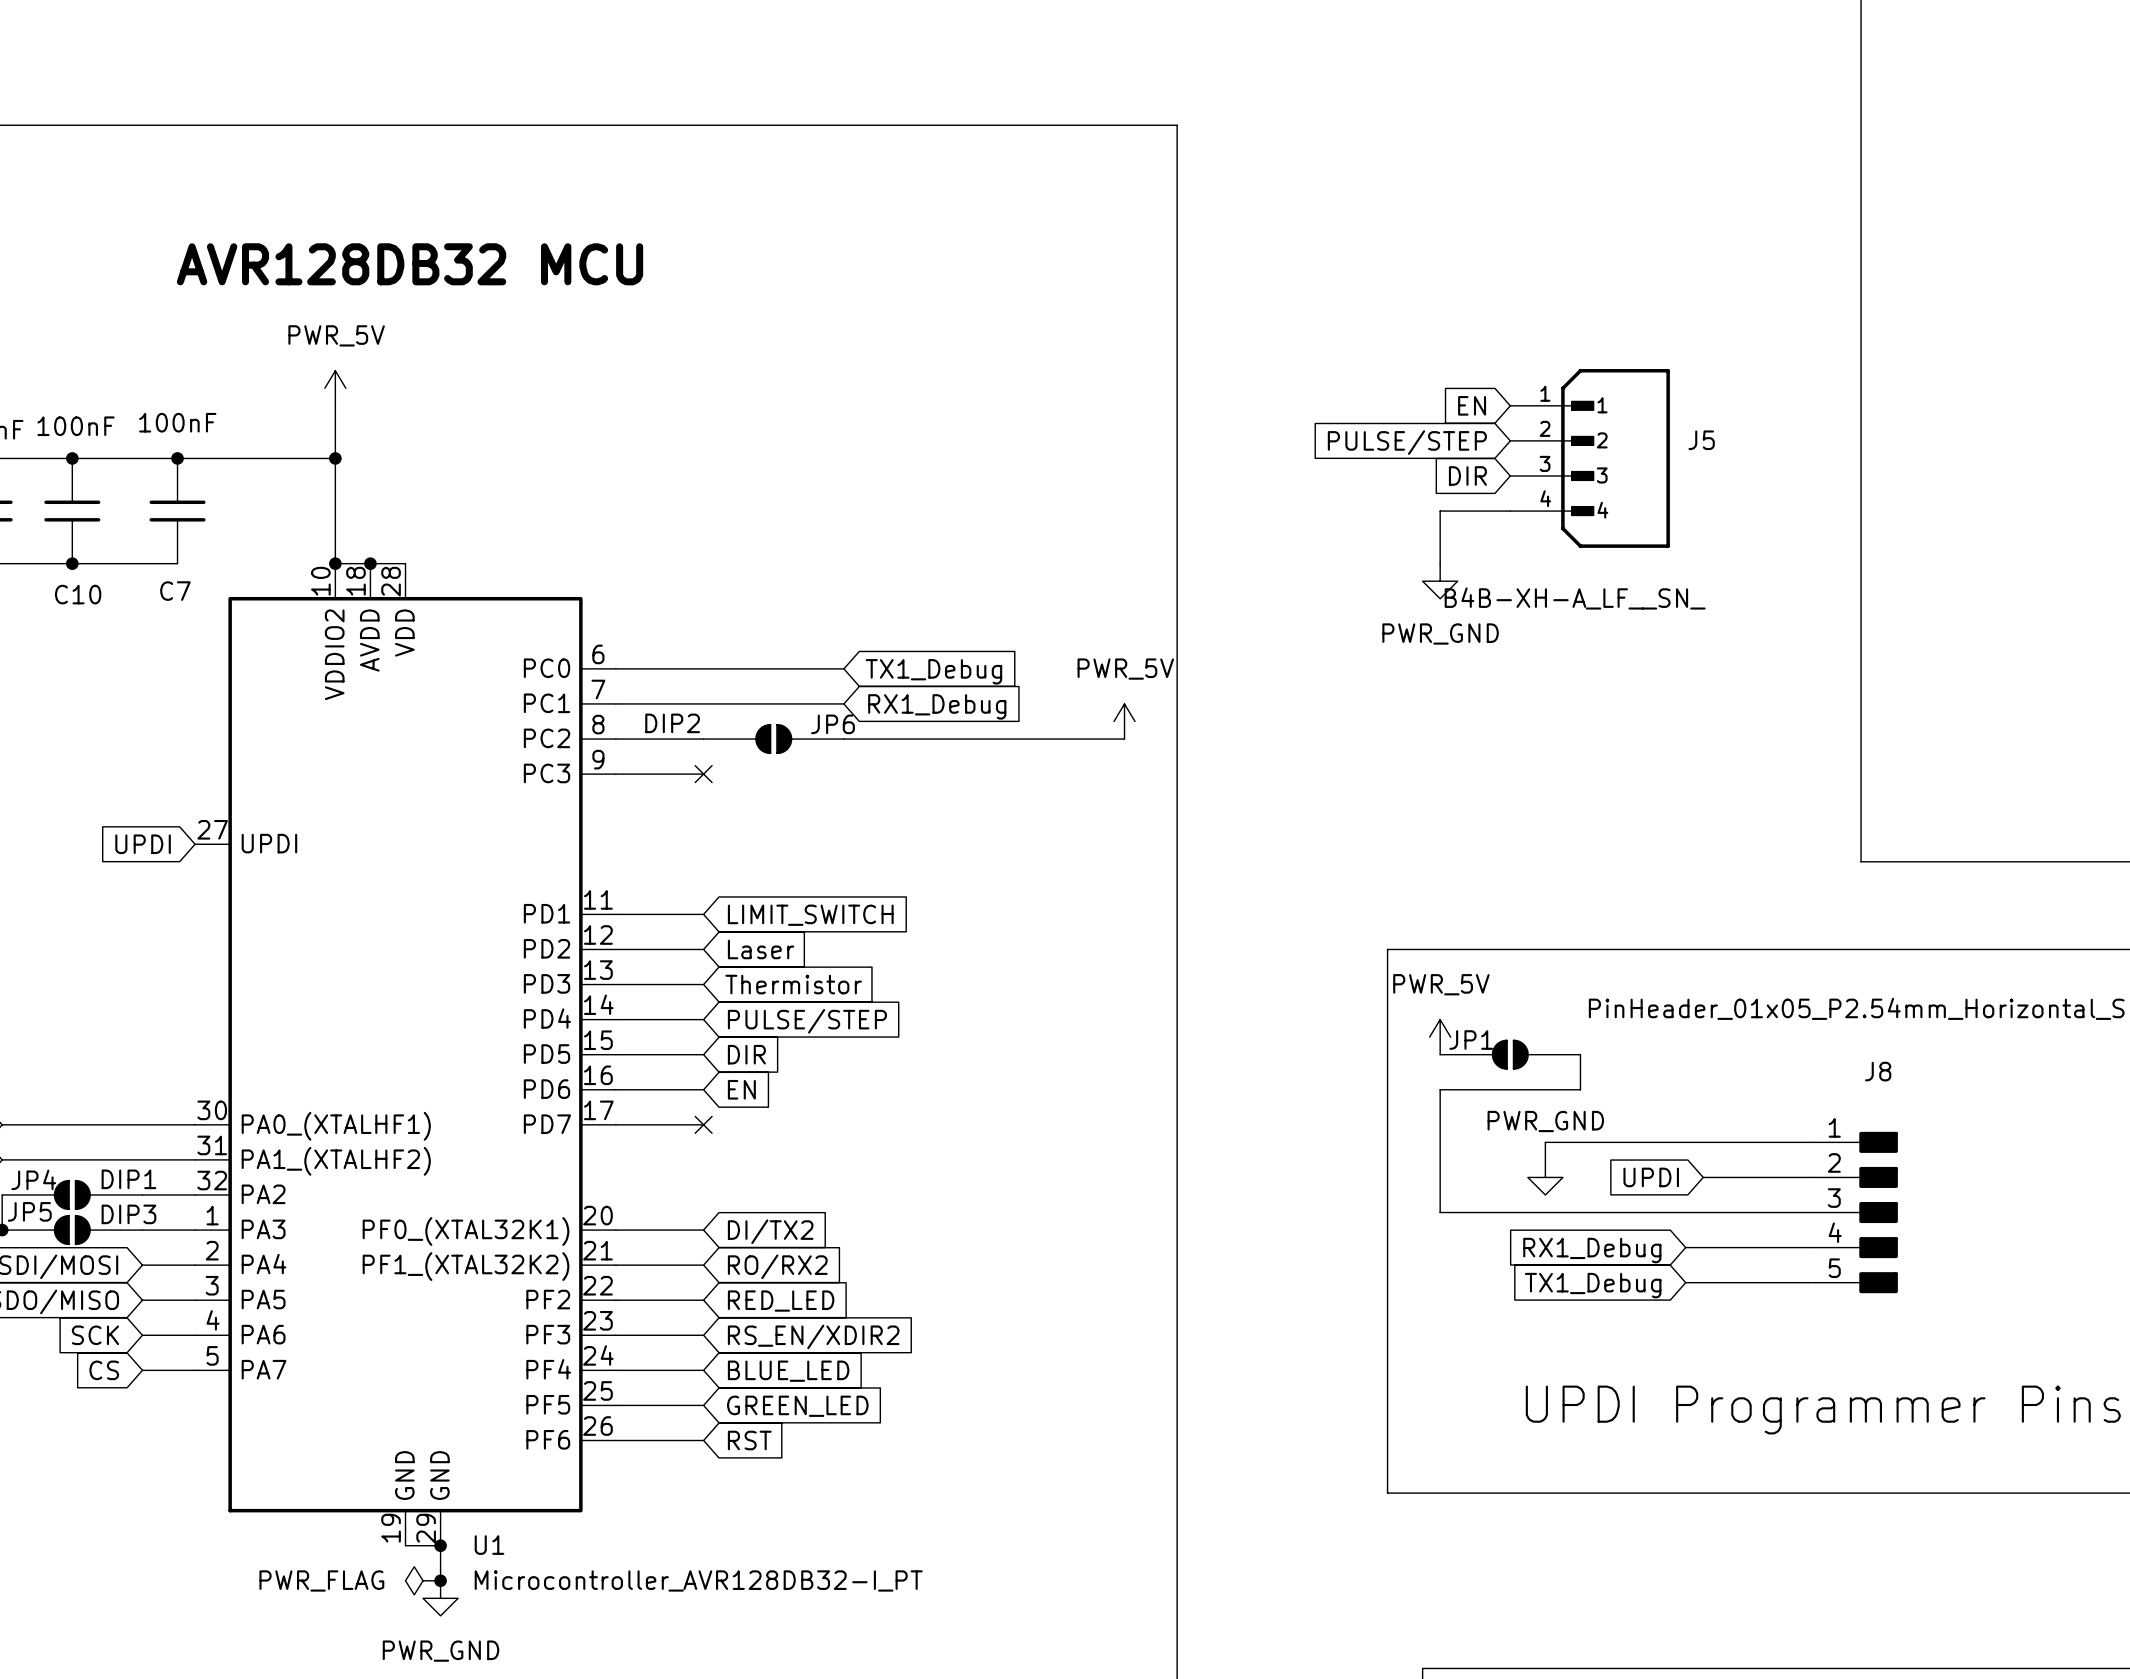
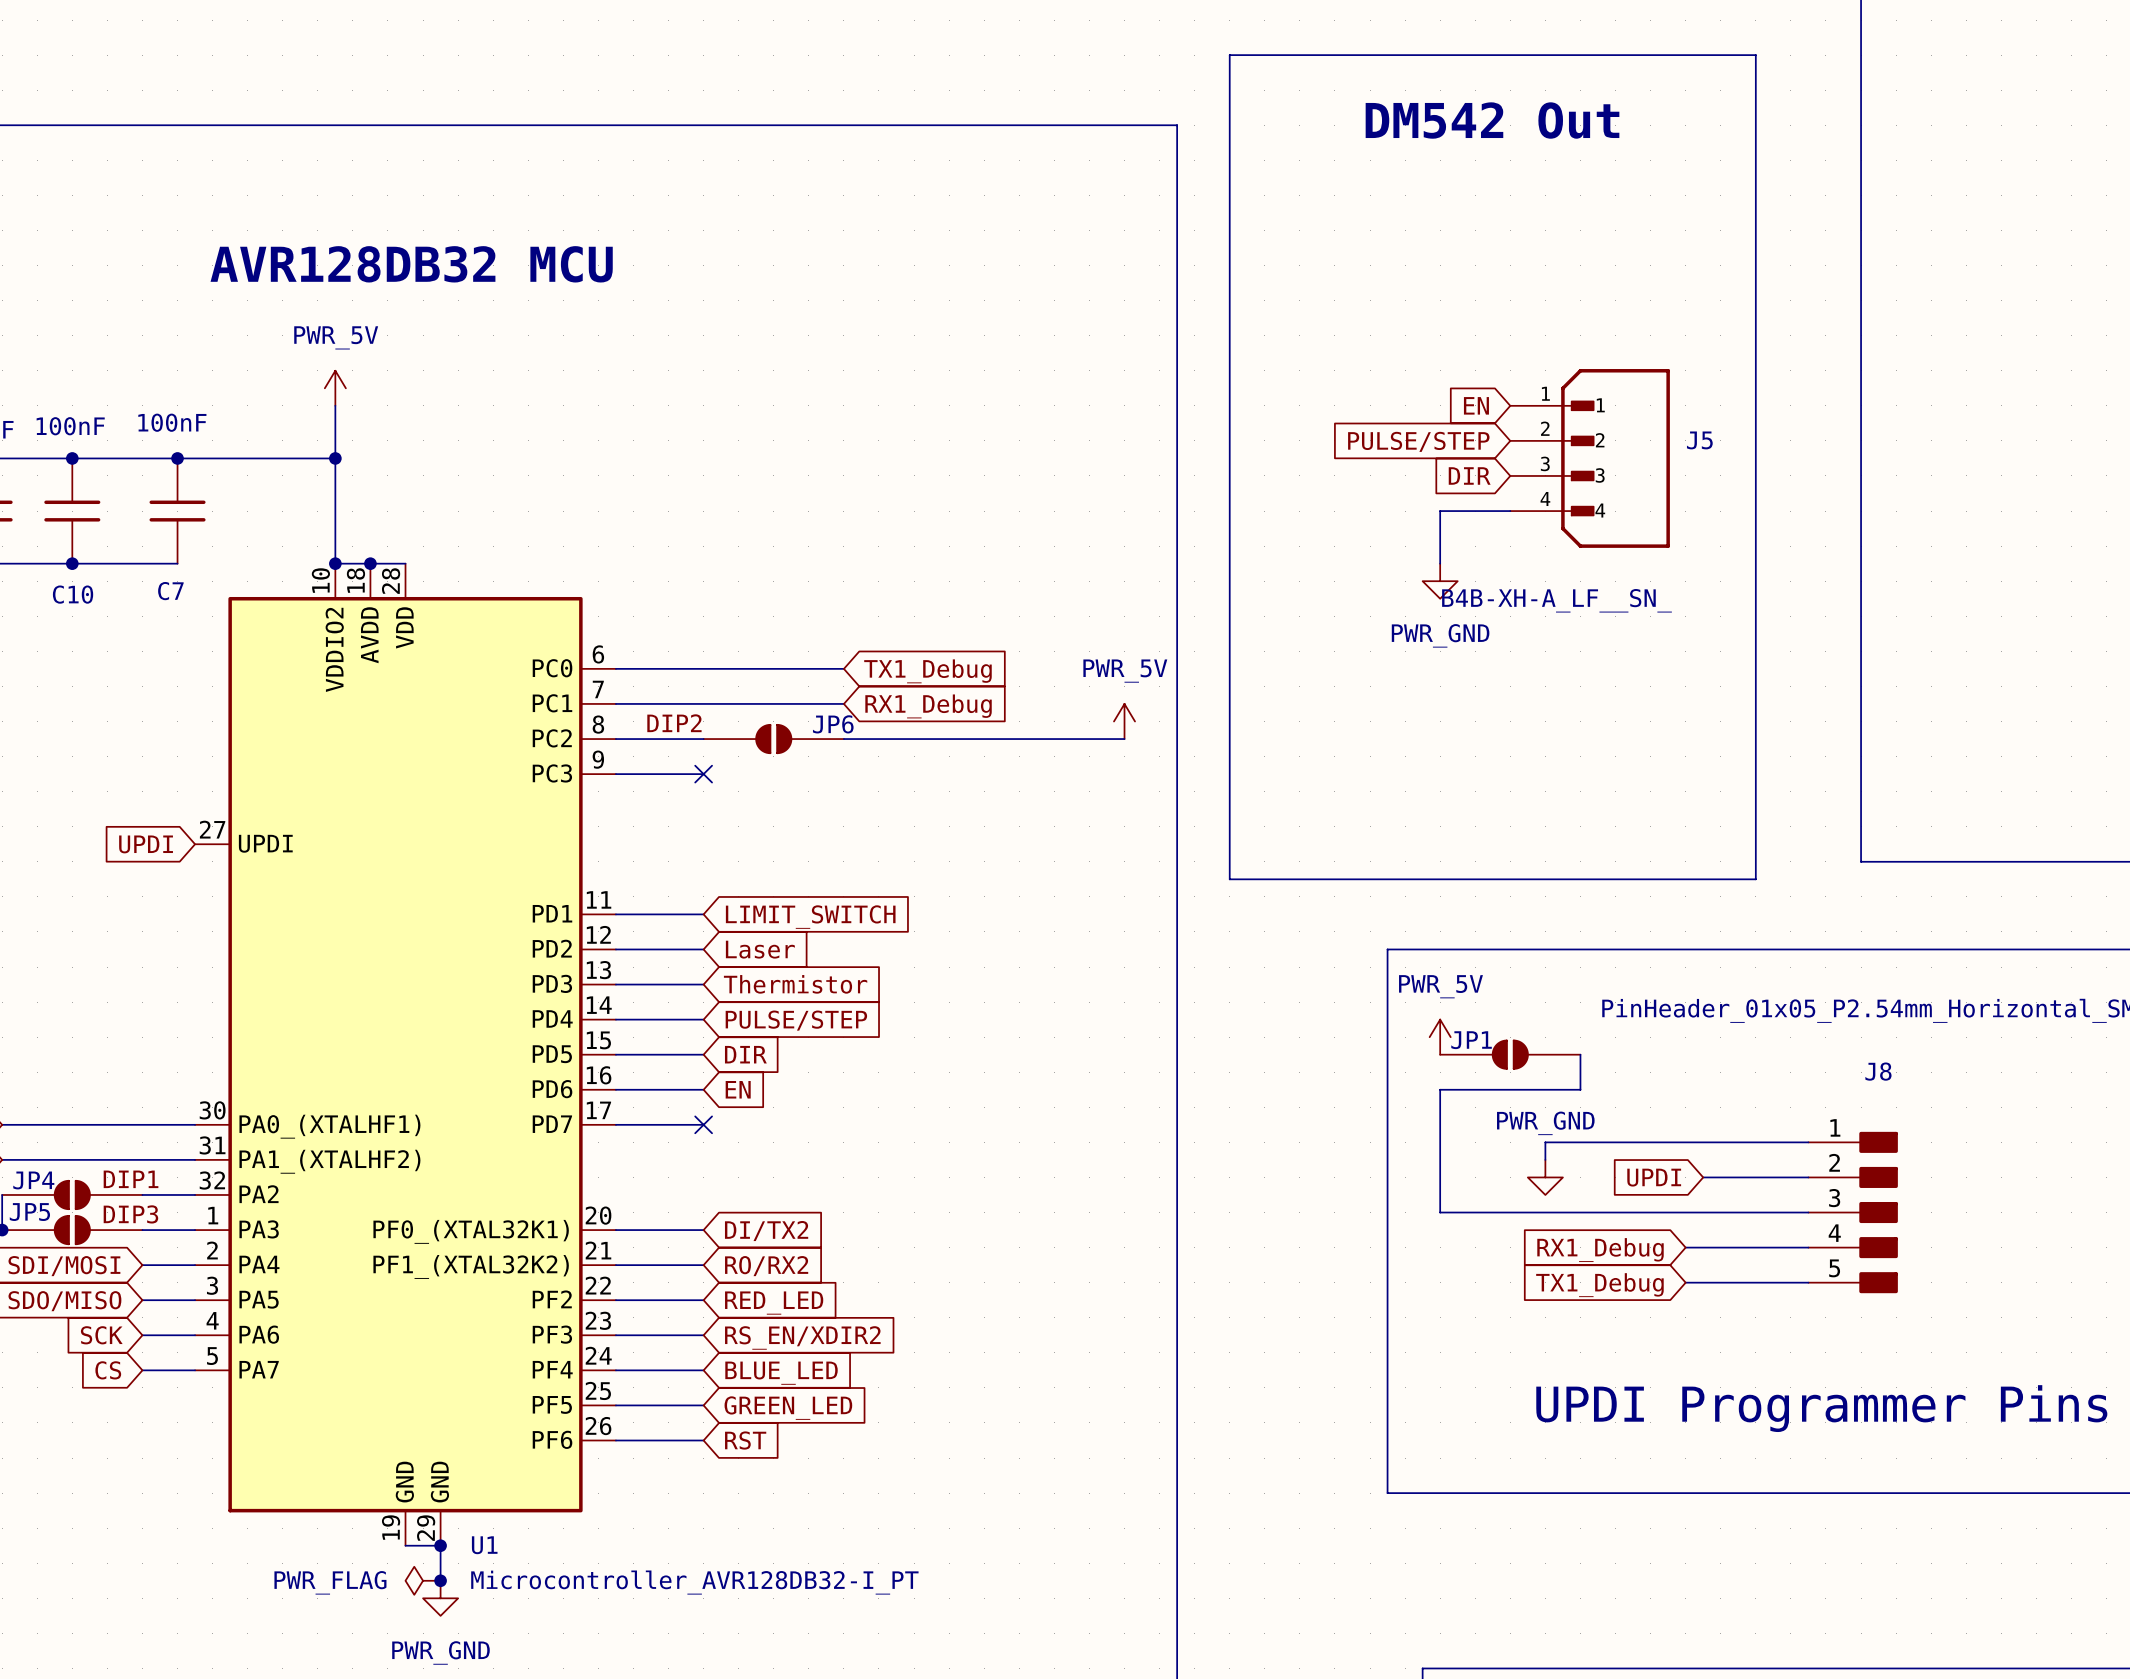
line: none -> (1229, 55) (1755, 55) (1755, 879) (1229, 879) (1229, 55)
text: none -> DM542 Out (1492, 120)

